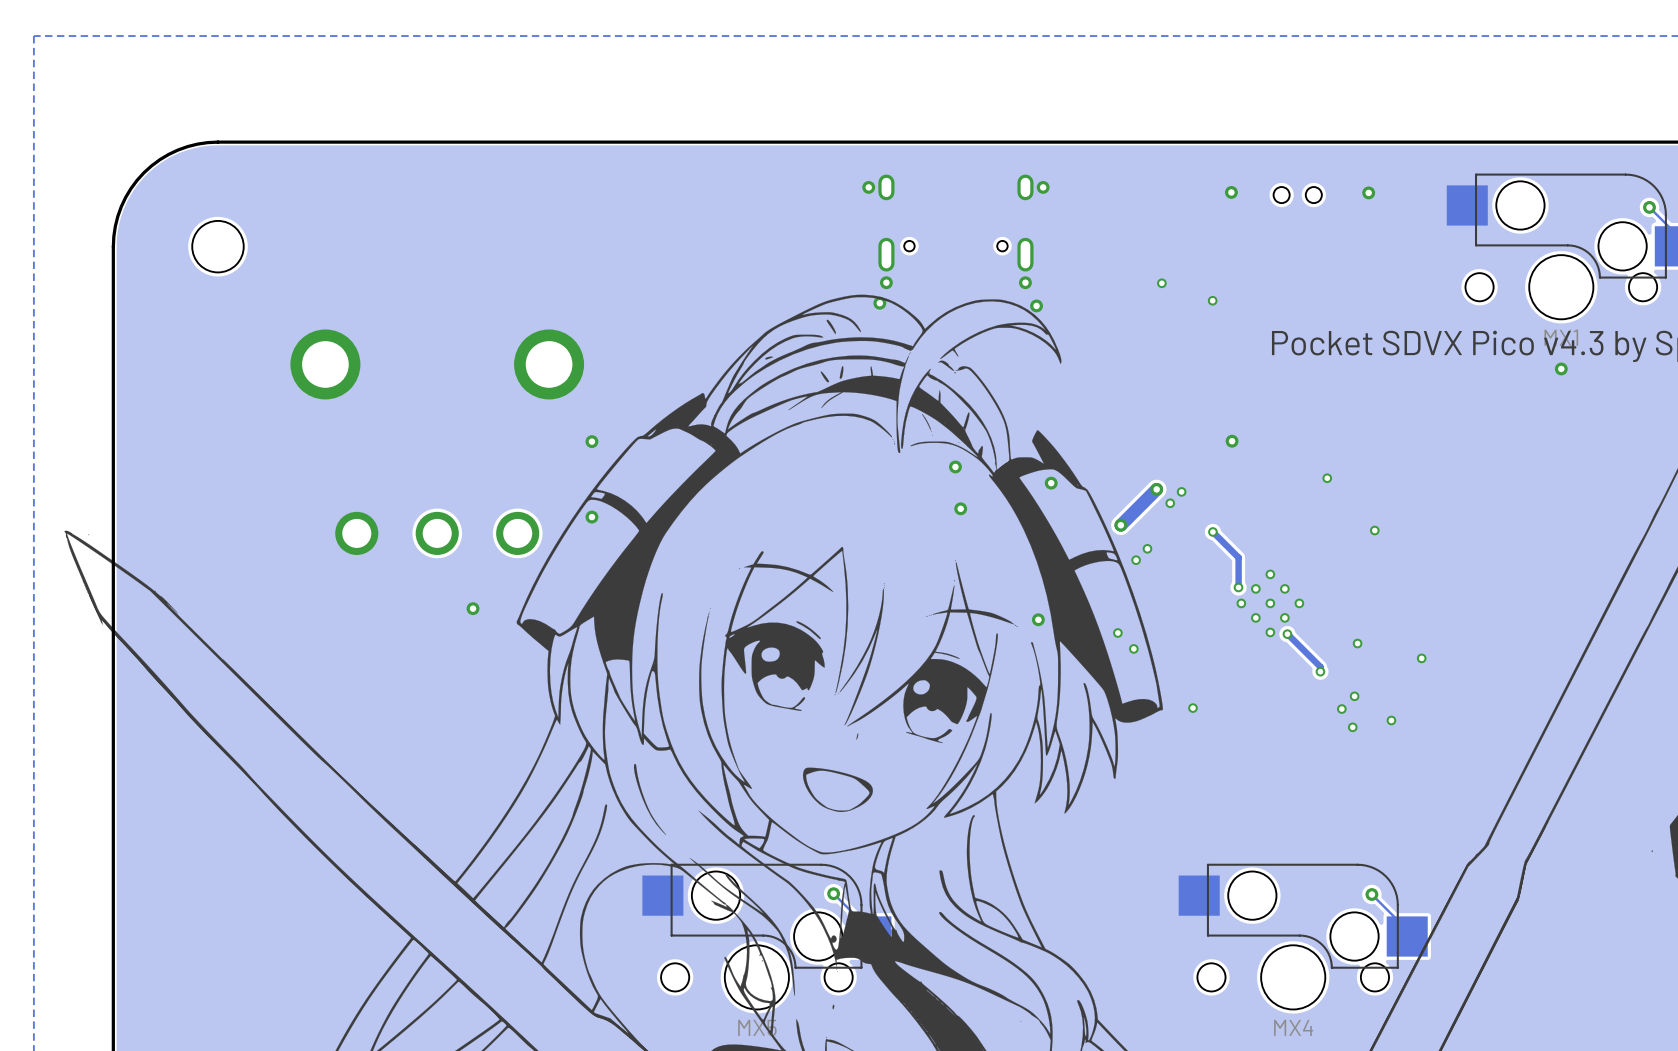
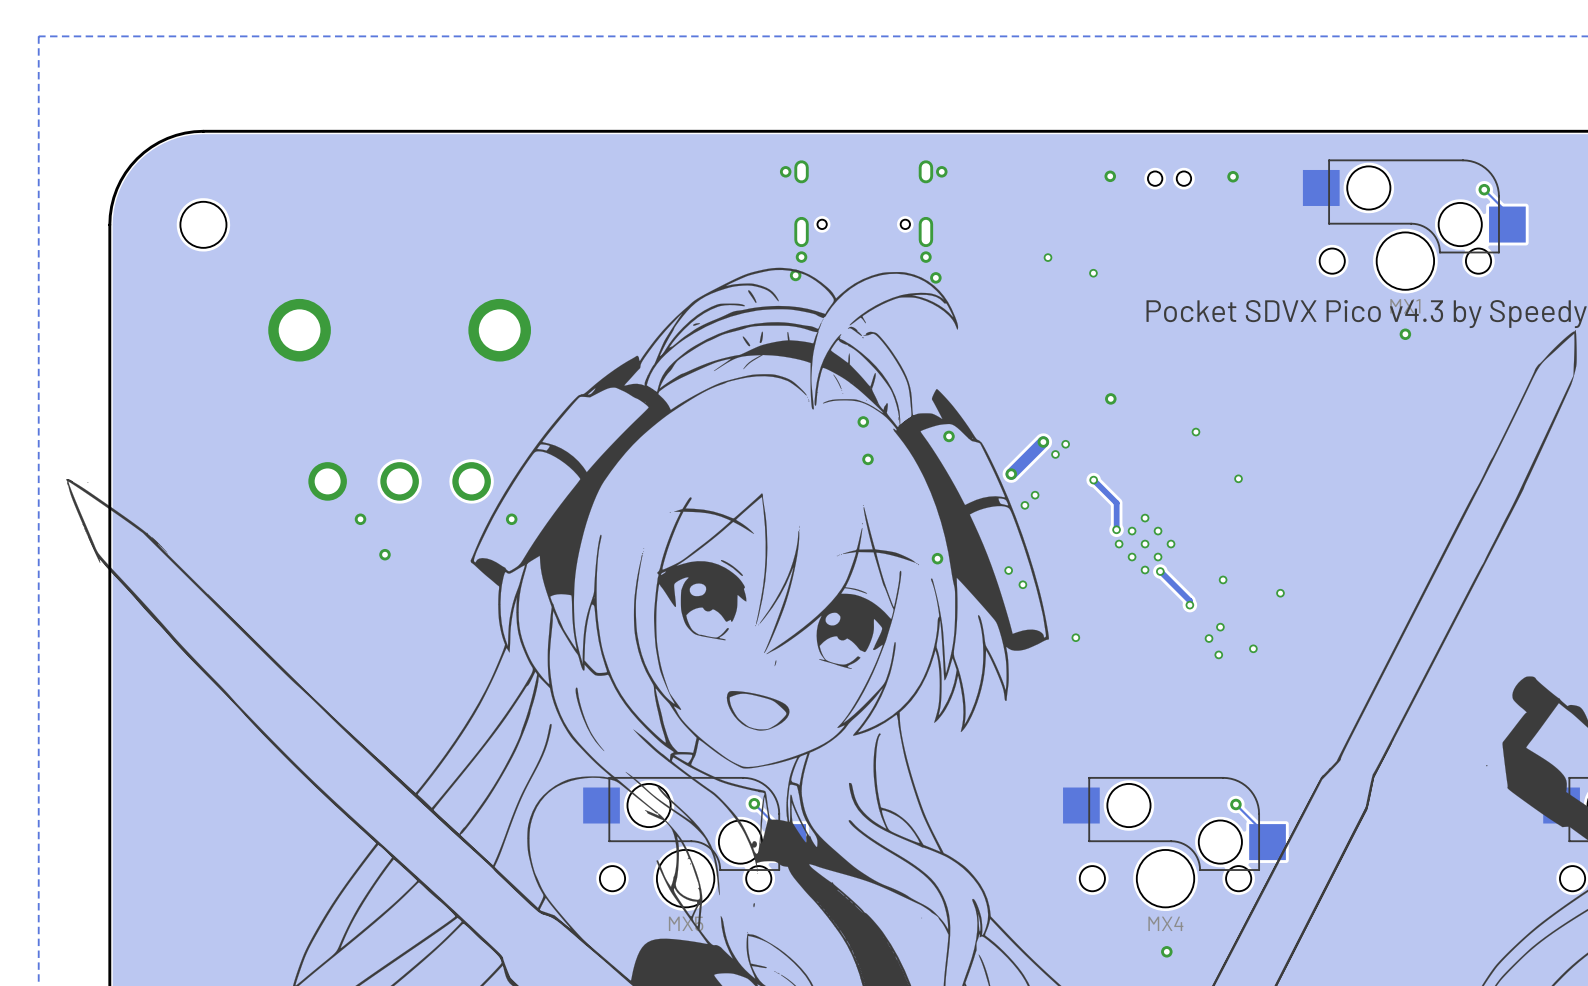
via: (591, 441) -> none
via: (591, 517) -> none
via: none -> (360, 519)
via: none -> (511, 519)
via: (473, 608) -> none
via: none -> (384, 554)

